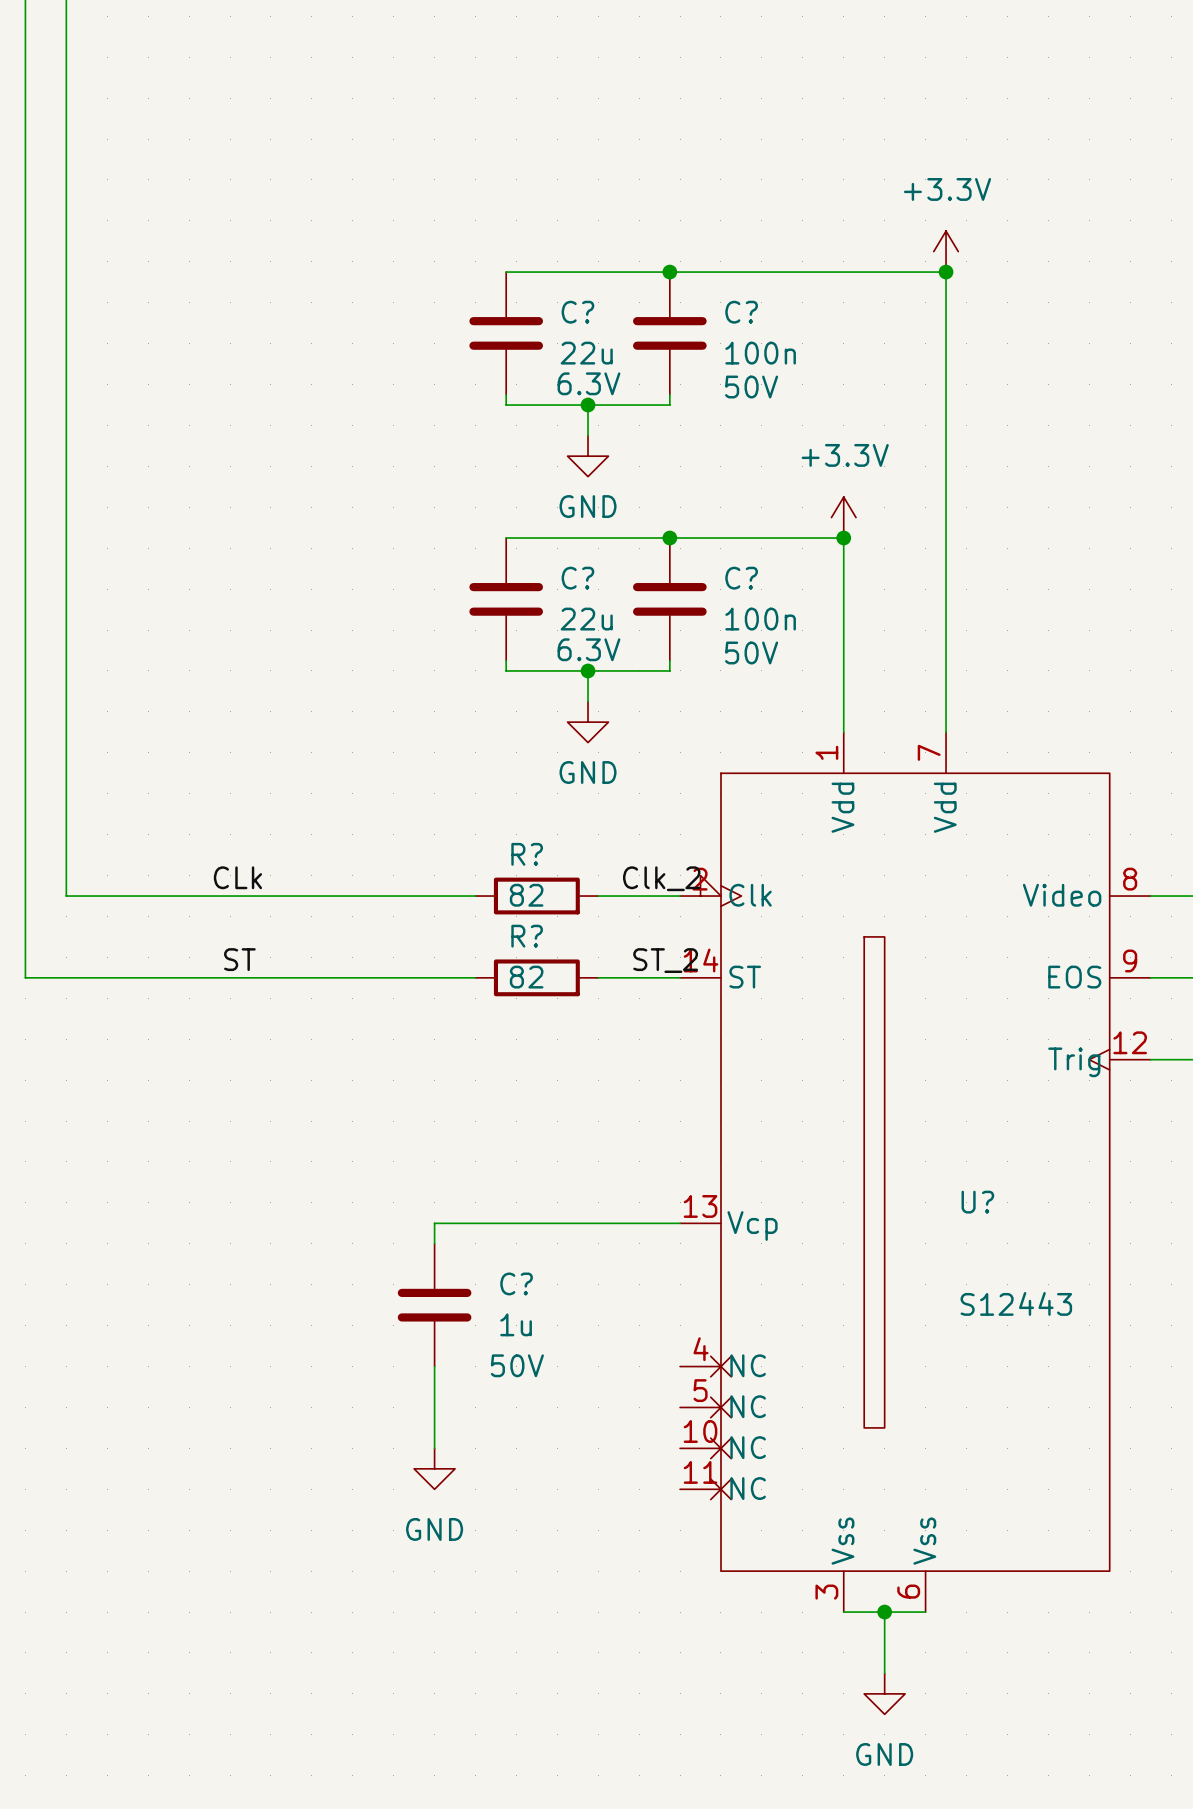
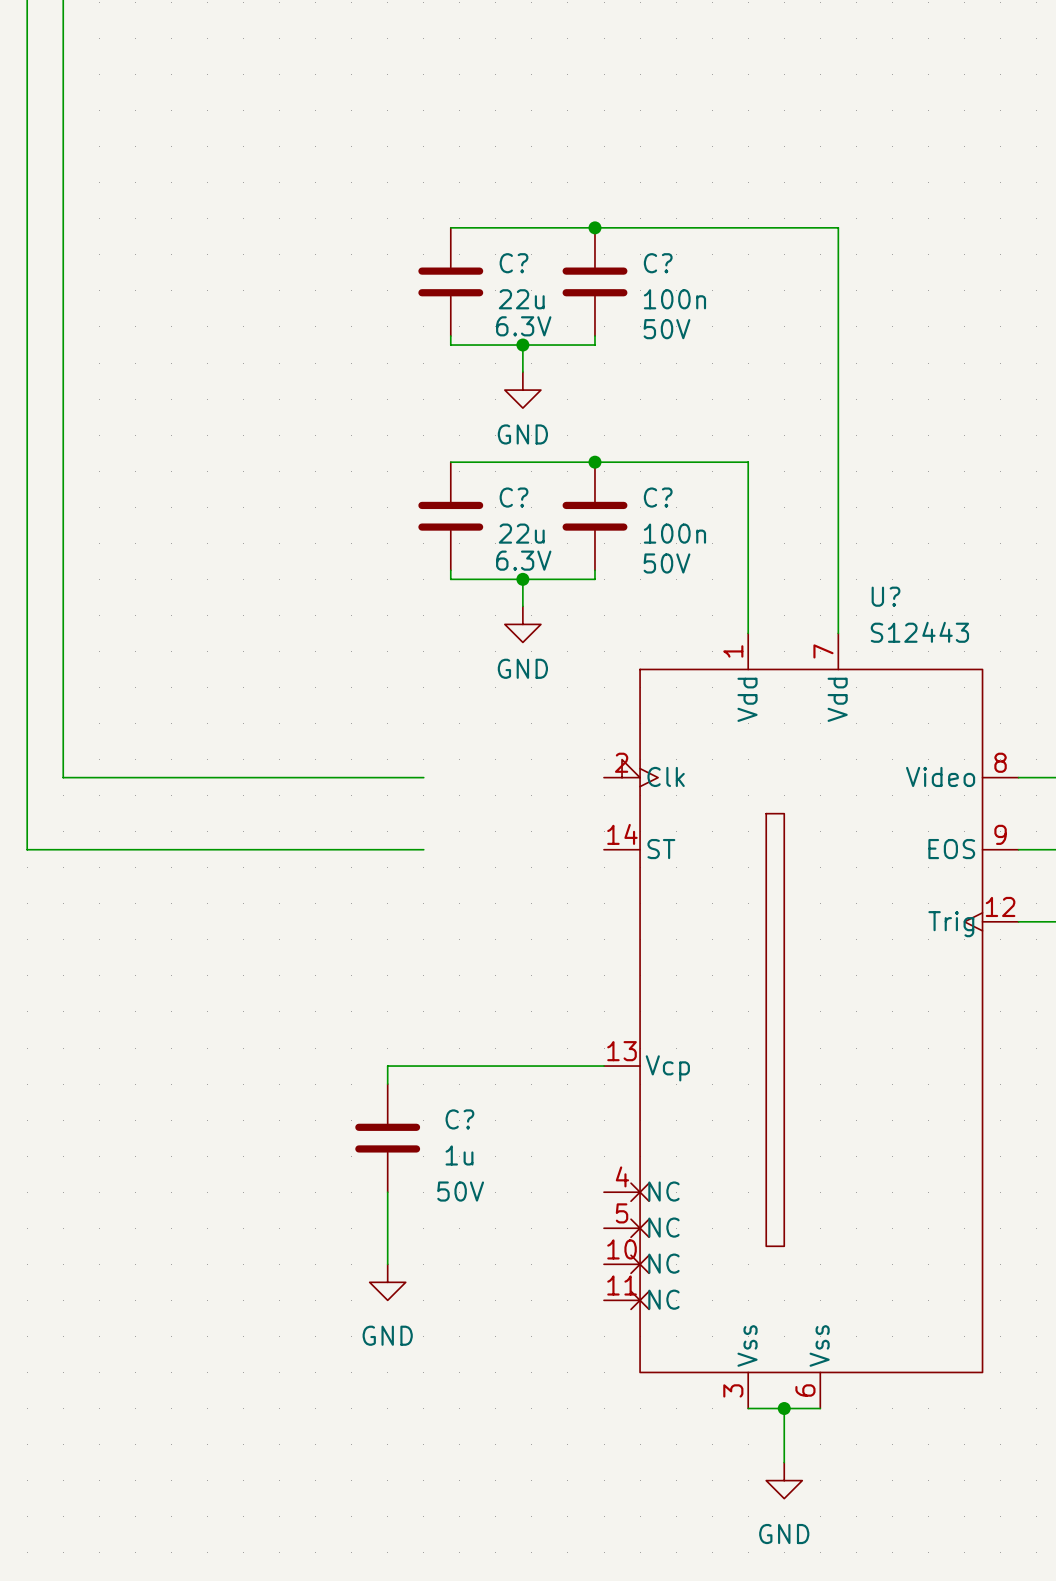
power symbol: +3.3V (946, 251) -> none
junction: (946, 272) -> none
power symbol: +3.3V (843, 517) -> none
junction: (843, 538) -> none
label: CLk (237, 877) -> none
label: Clk_2 (661, 878) -> none
R?: 82 (536, 896) -> none
wire: (598, 896) (680, 896) -> none
label: ST (239, 959) -> none
label: ST_2 (665, 960) -> none
R?: 82 (536, 977) -> none
wire: (598, 977) (680, 977) -> none
U? name position: U? (977, 1202) -> U? (886, 596)
U? value position: S12443 (1016, 1303) -> S12443 (919, 632)

